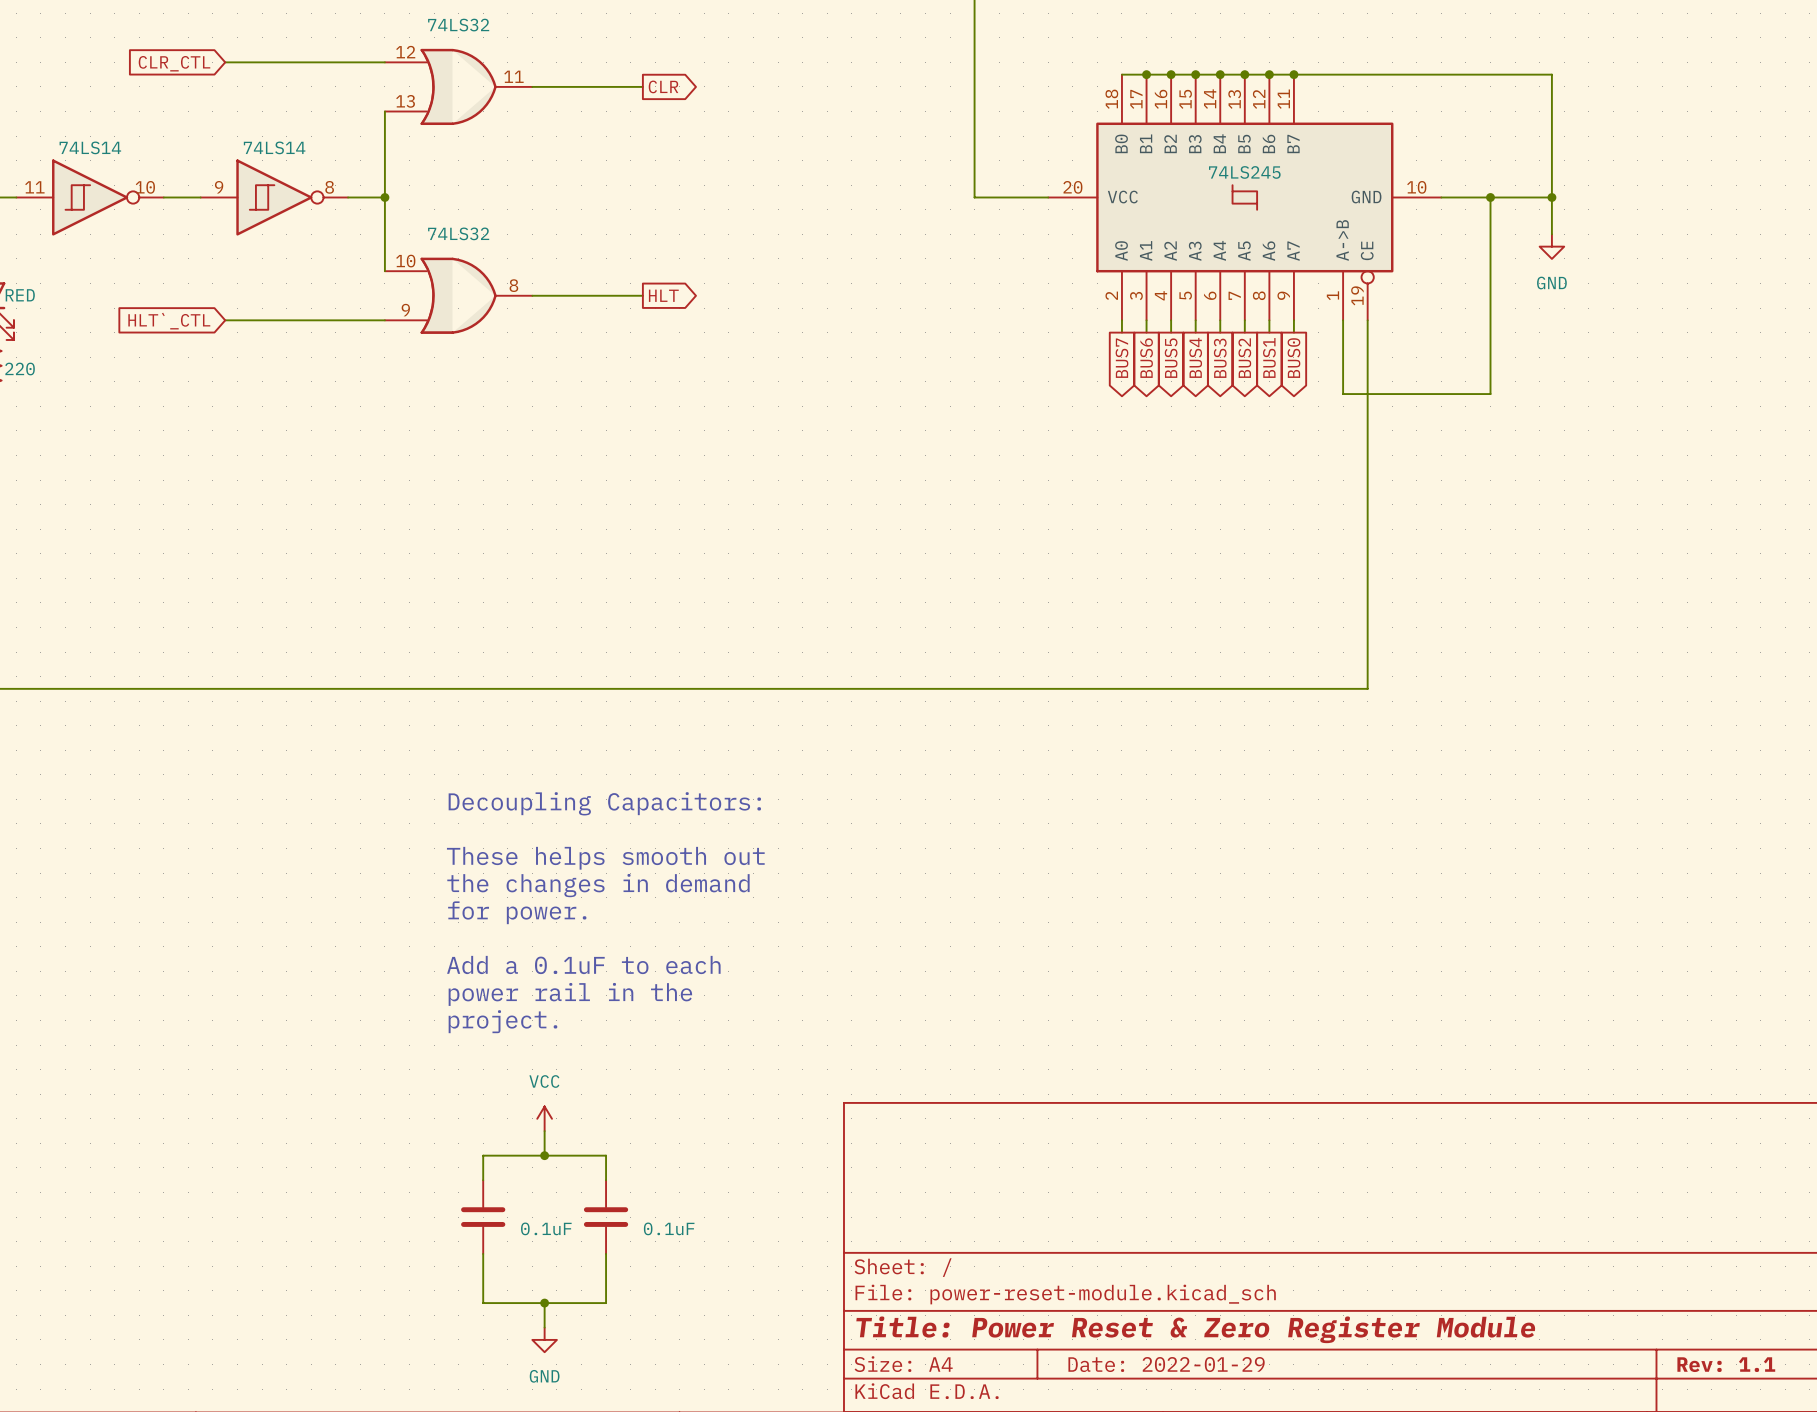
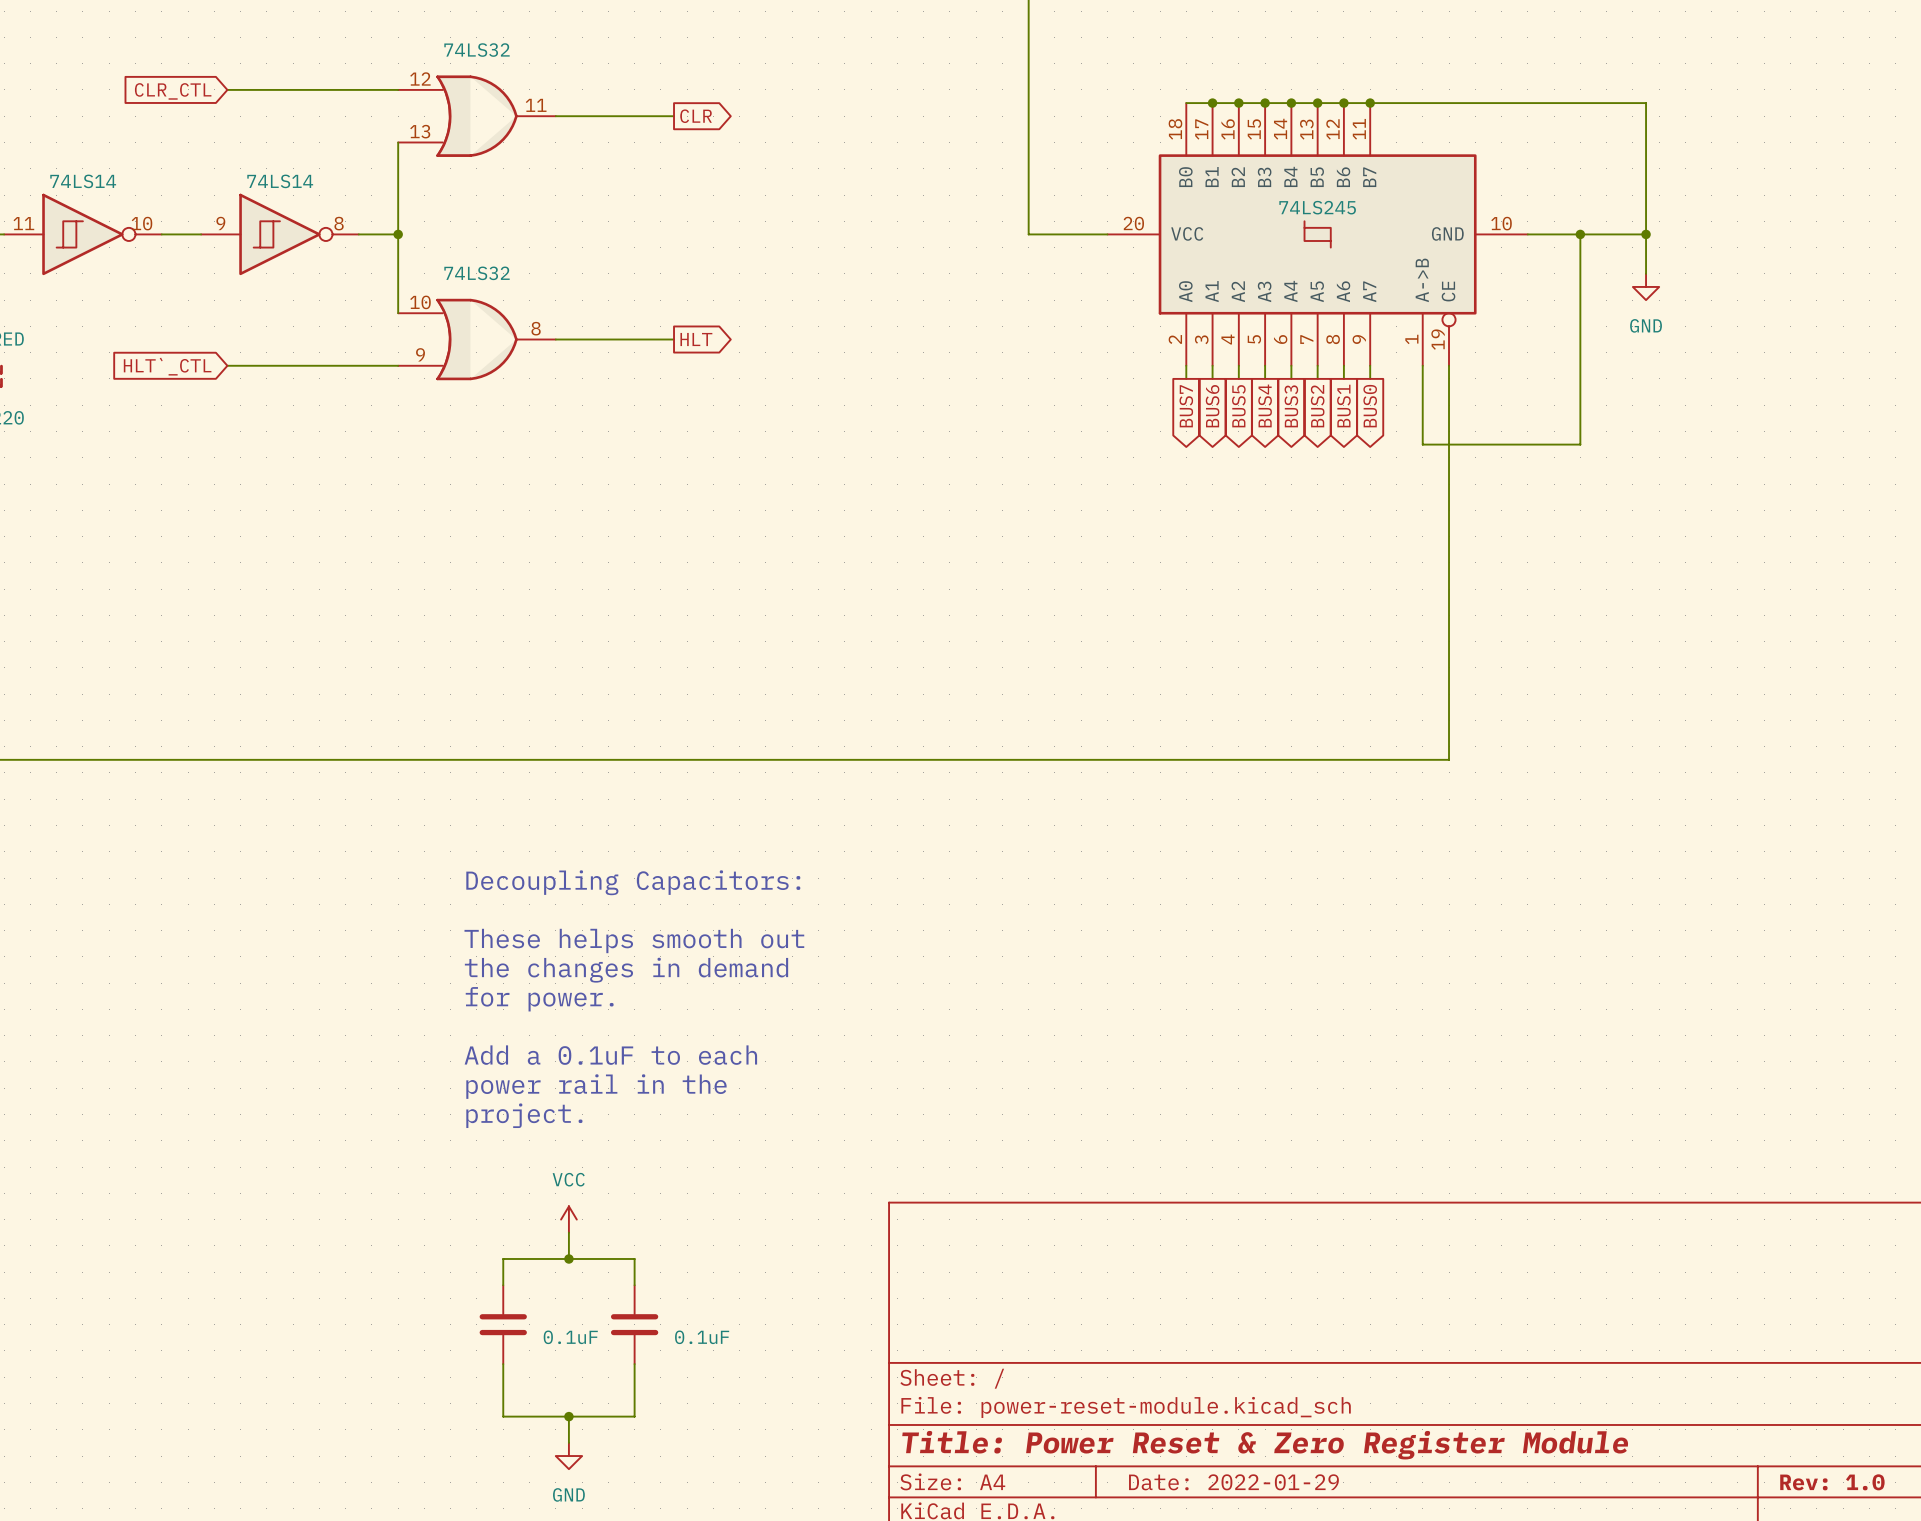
title block: Rev: 1.1 (1726, 1364) -> Rev: 1.0 (1832, 1482)

